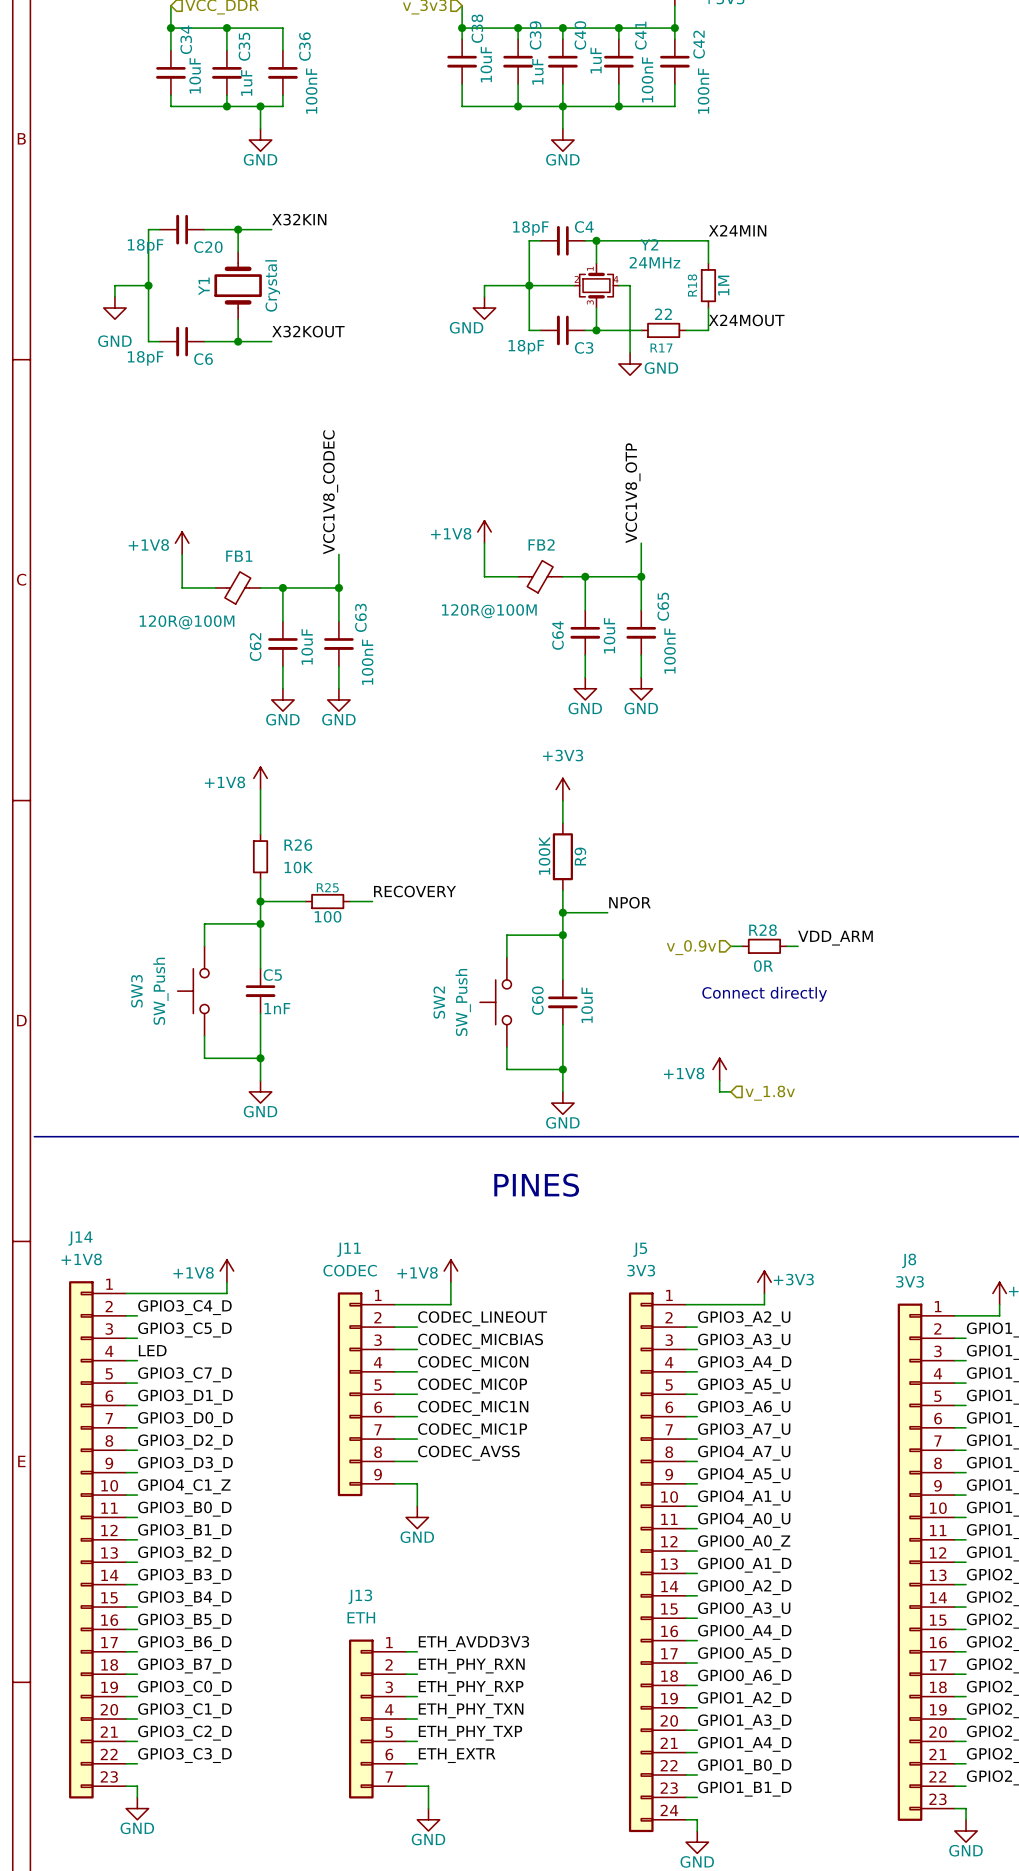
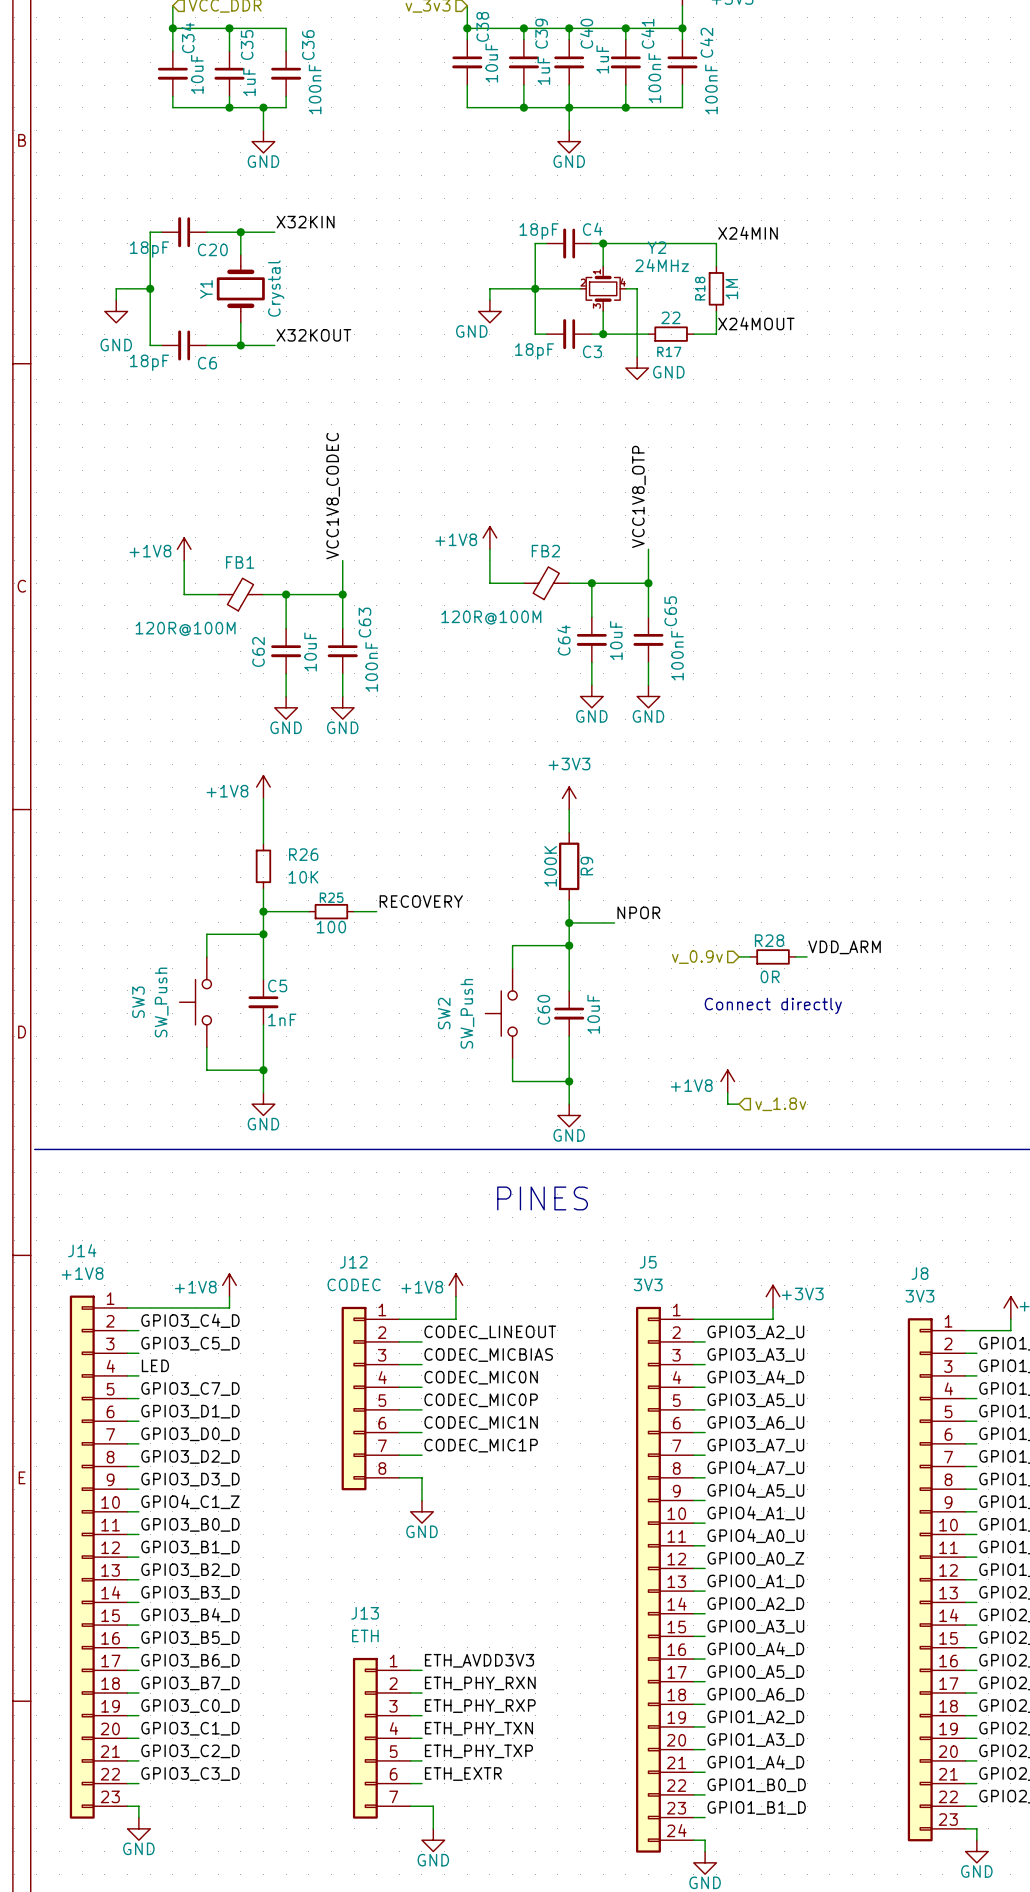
J12: none -> CODEC (370, 1398)
J11: CODEC (366, 1394) -> none
label: CODEC_AVSS (468, 1453) -> none
wire: none -> (421, 1477) (421, 1500)
wire: (394, 1483) (417, 1483) (417, 1506) -> none
power symbol position: GND (417, 1517) -> GND (421, 1511)

